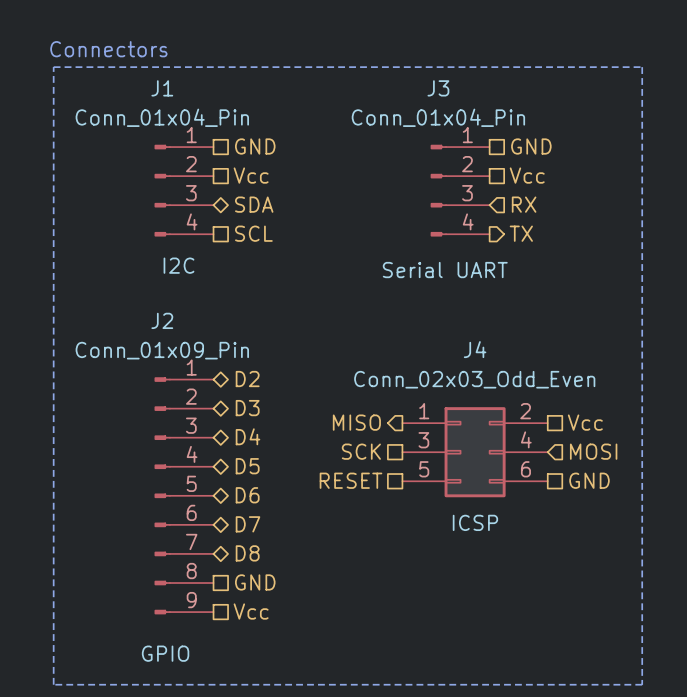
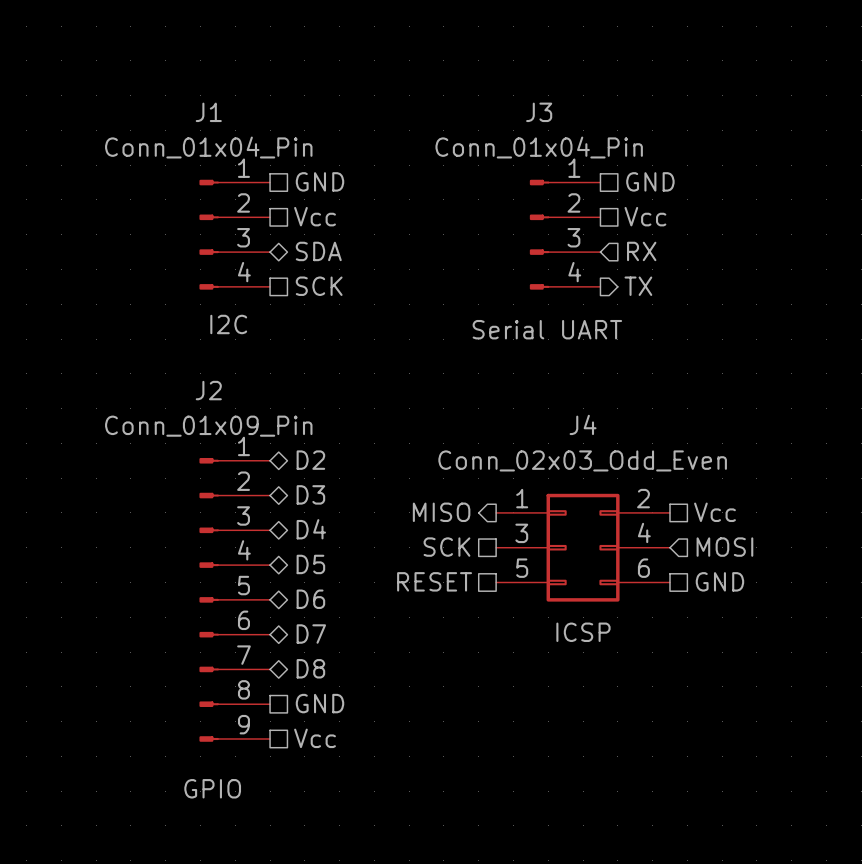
text: Connectors (108, 49) -> none
line: (53, 67) (642, 67) (642, 684) (53, 684) (53, 67) -> none
hierarchical label: SCL (253, 233) -> SCK (319, 286)

